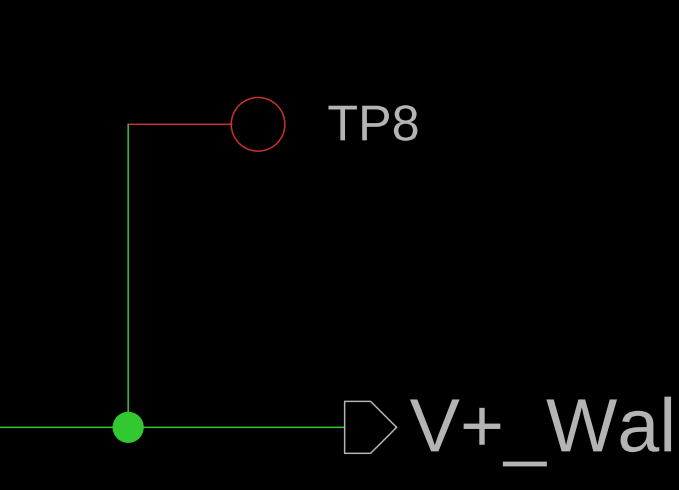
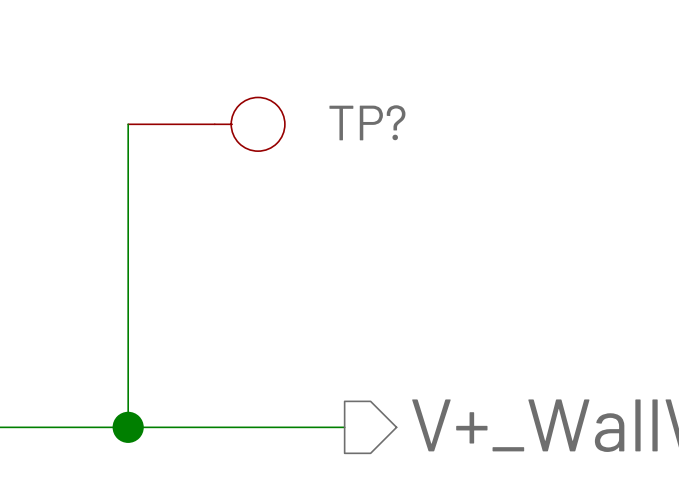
TP8 name: TP8 (372, 122) -> TP? (367, 122)

